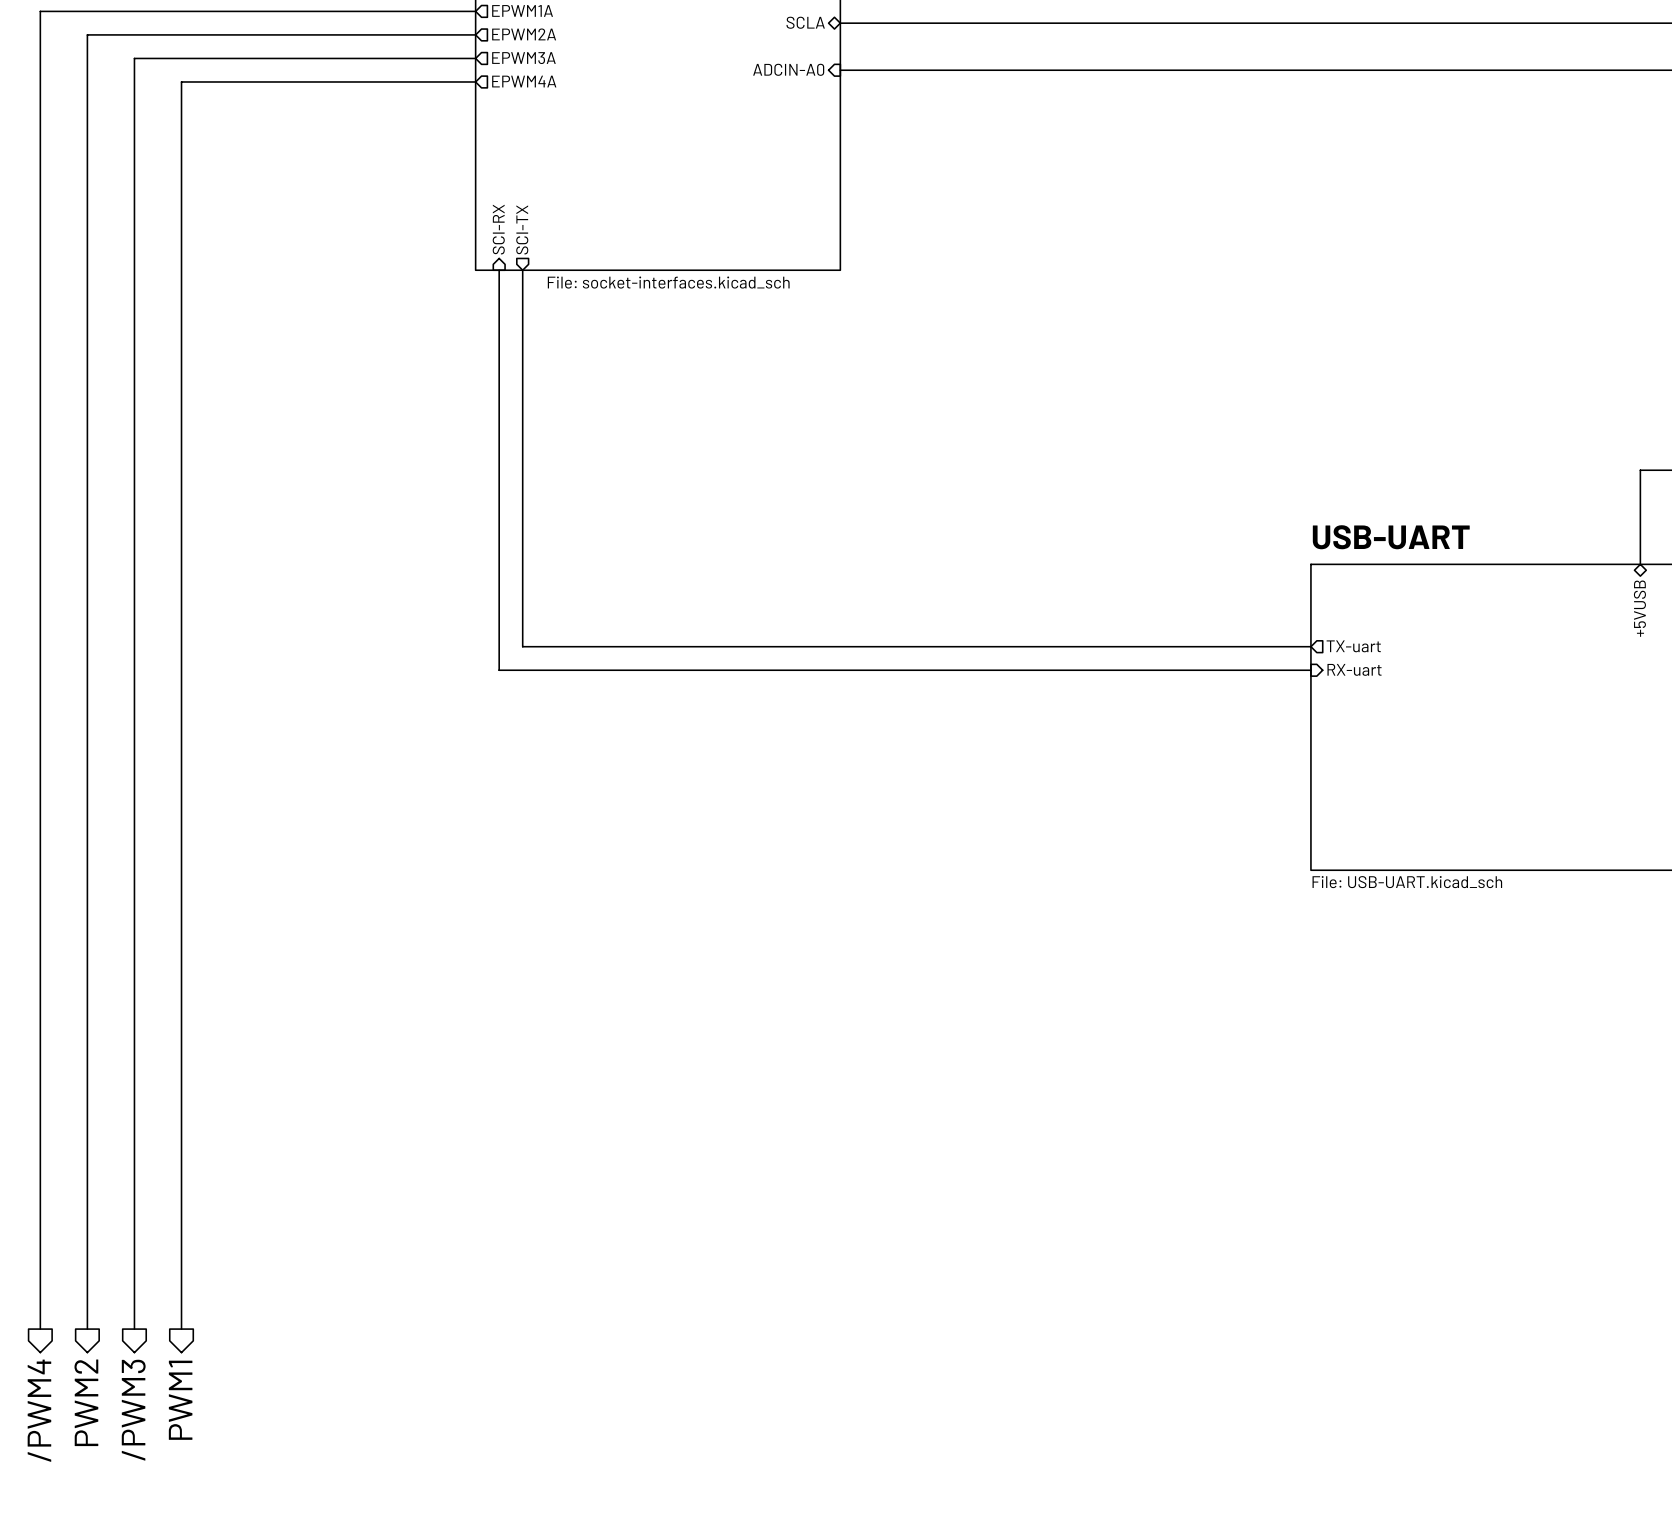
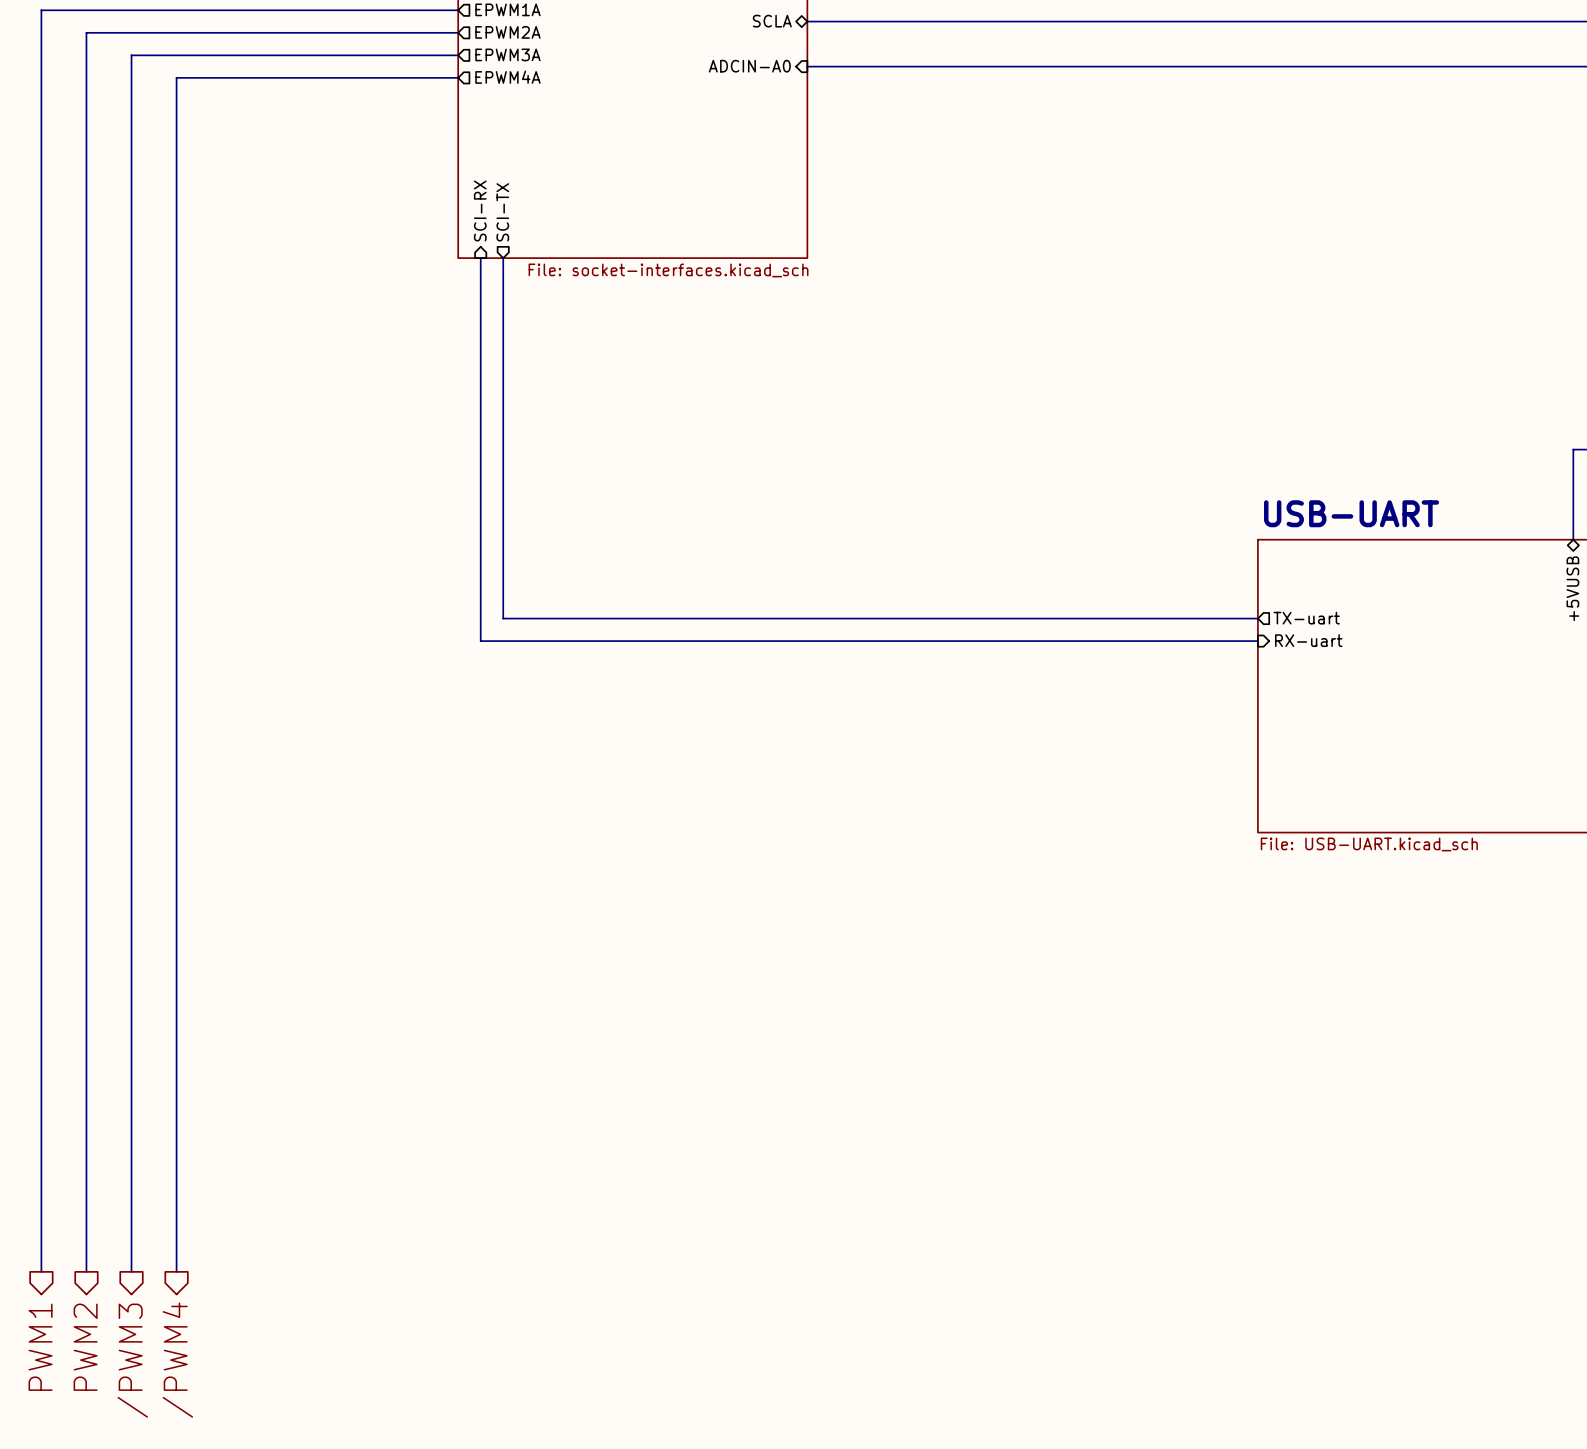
hierarchical label: PWM1 (180, 1400) -> /PWM4 (177, 1360)
hierarchical label: /PWM4 (39, 1410) -> PWM1 (40, 1347)

